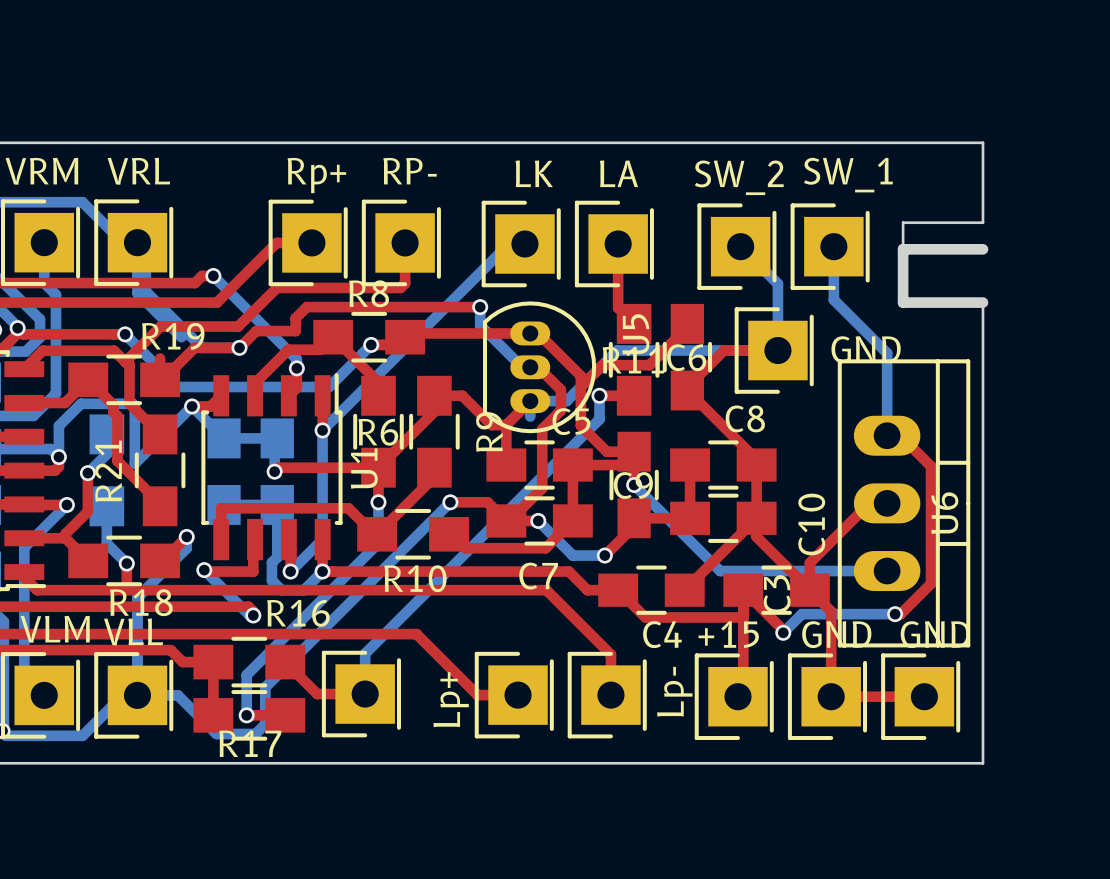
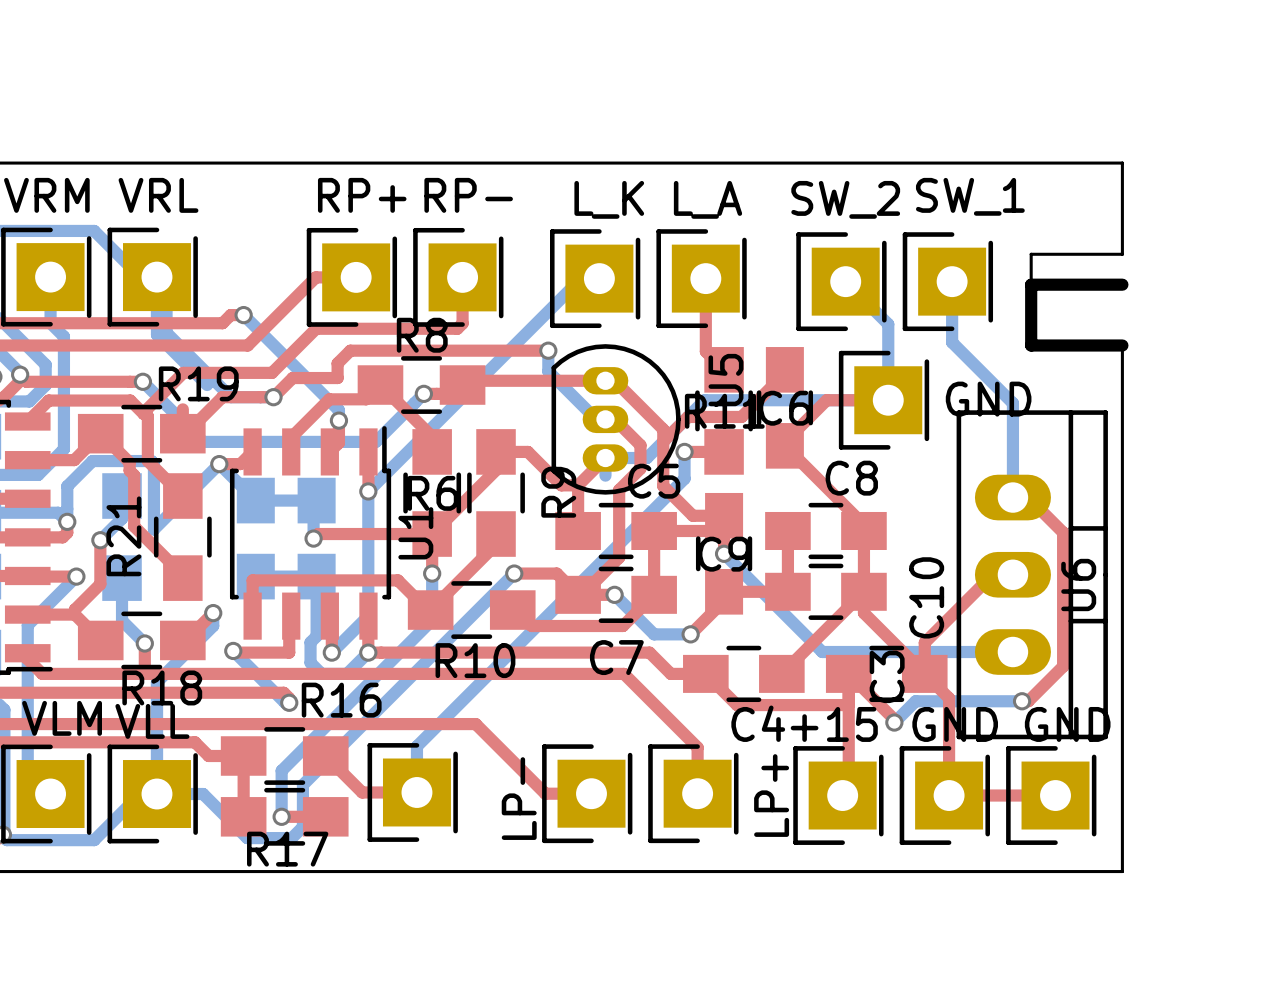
part value: LK (534, 173) -> L_K (609, 199)
part value: LA (618, 173) -> L_A (708, 199)
part value: Rp+ (316, 175) -> RP+ (362, 195)
part value: Lp- (674, 691) -> LP+ (771, 795)
part value: Lp+ (451, 699) -> LP- (519, 798)

